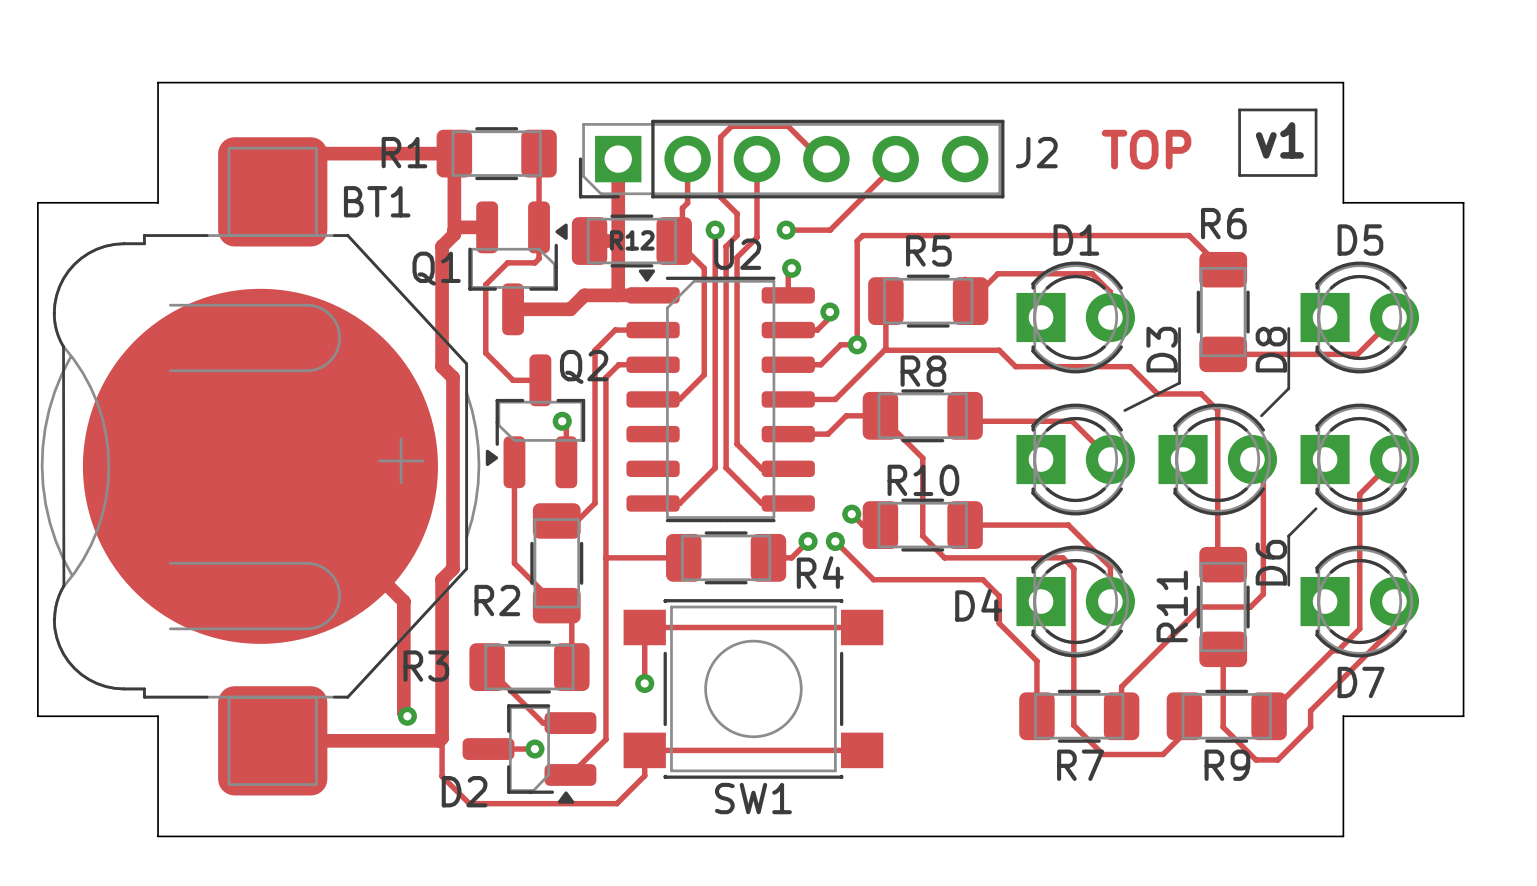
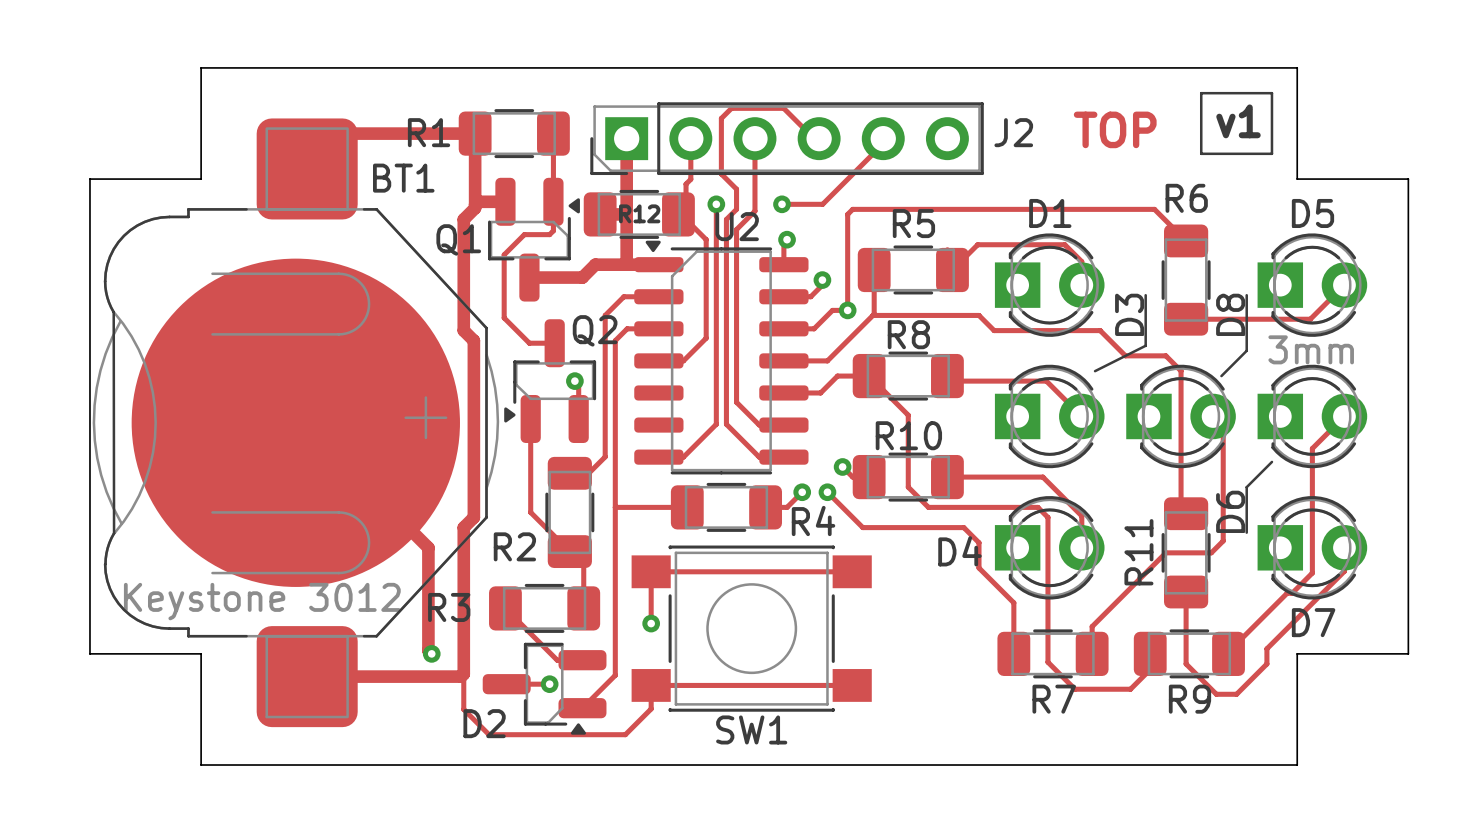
D5 value: none -> 3mm (1311, 349)
BT1 value: none -> Keystone 3012 (262, 601)

